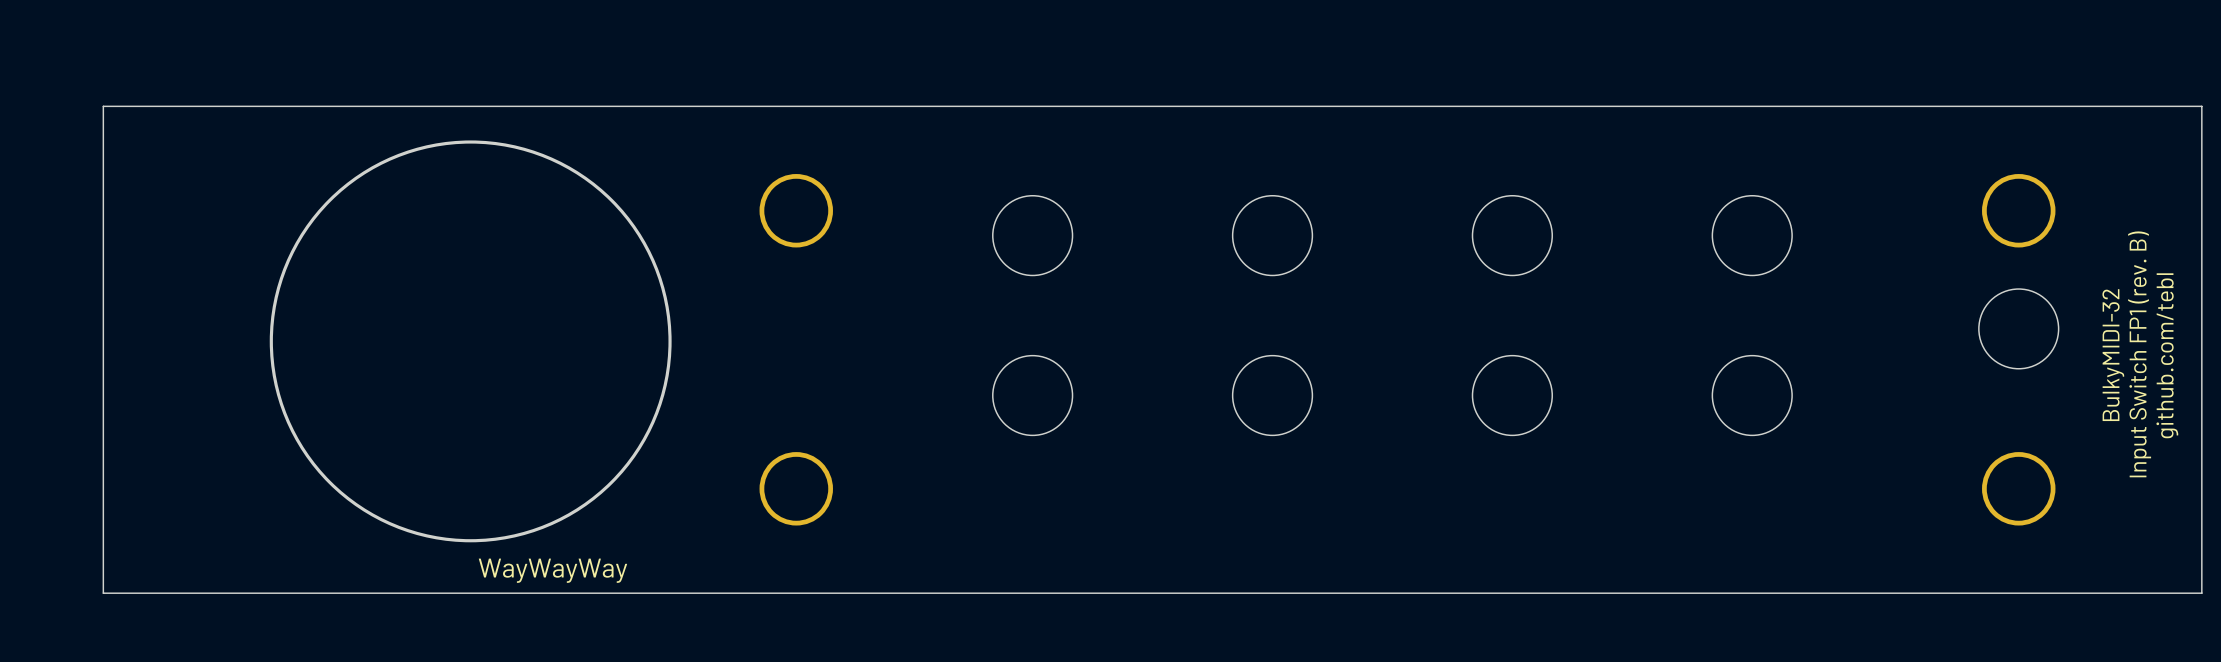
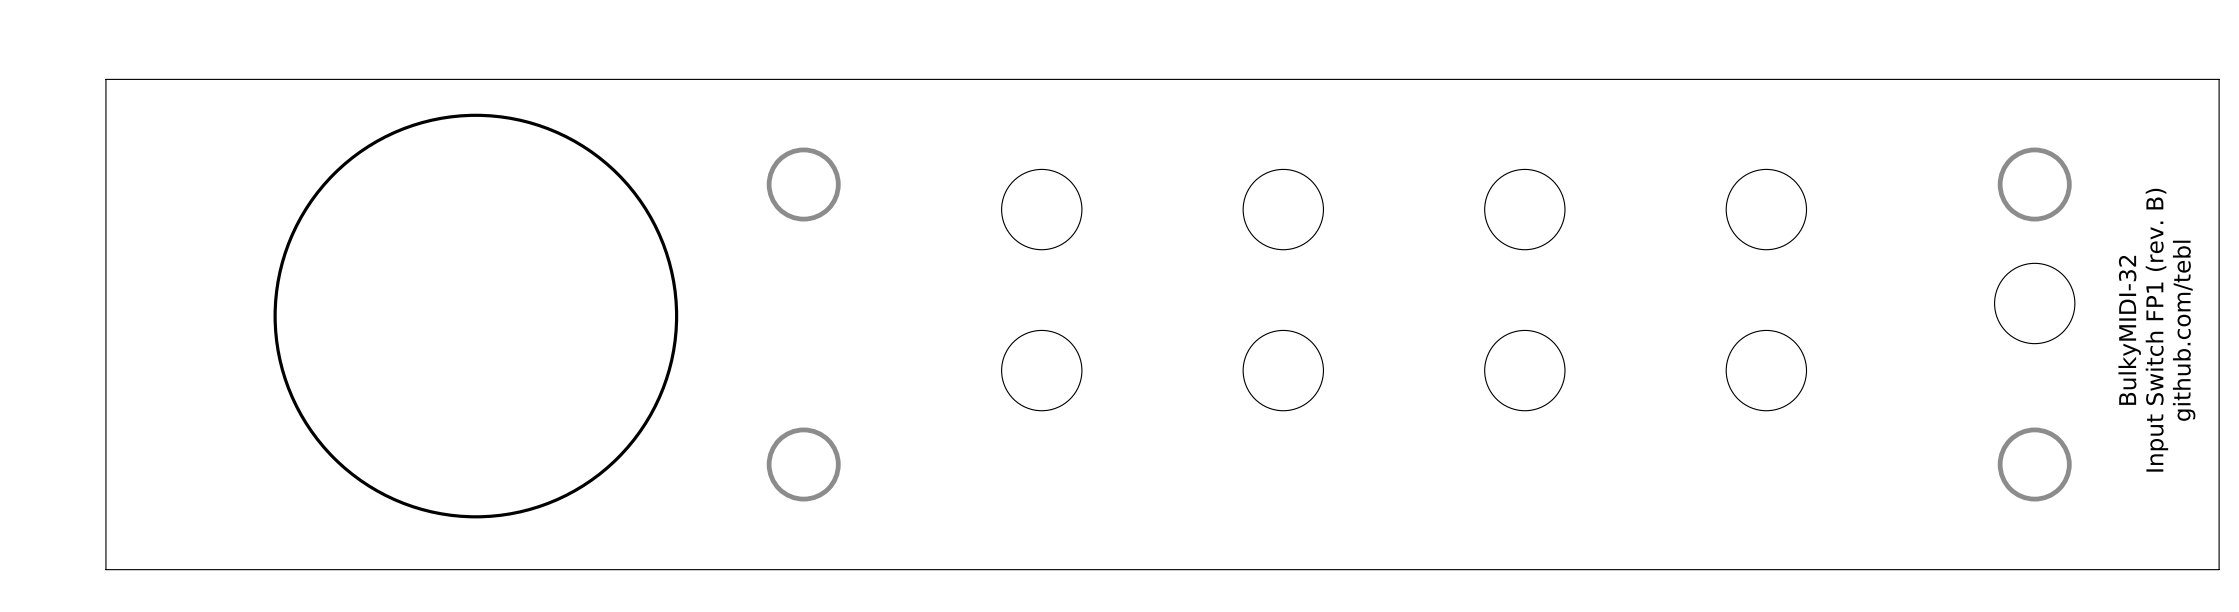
text: WayWayWay (553, 570) -> none

